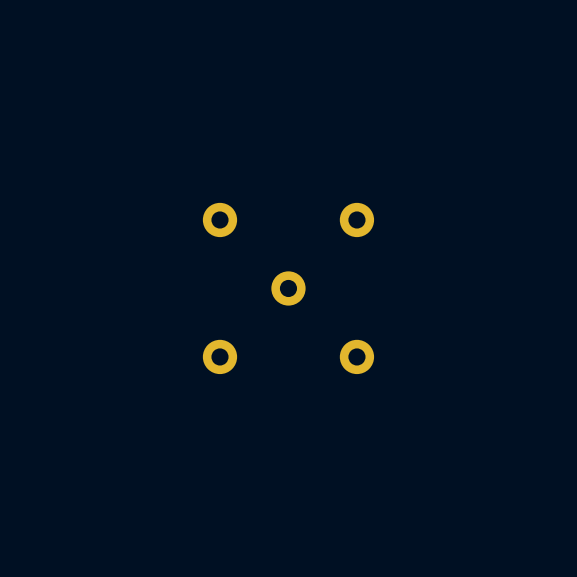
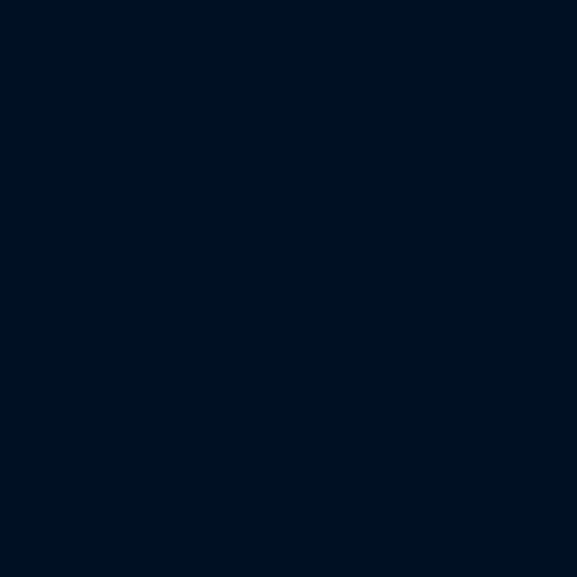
part: (288, 288) -> none

